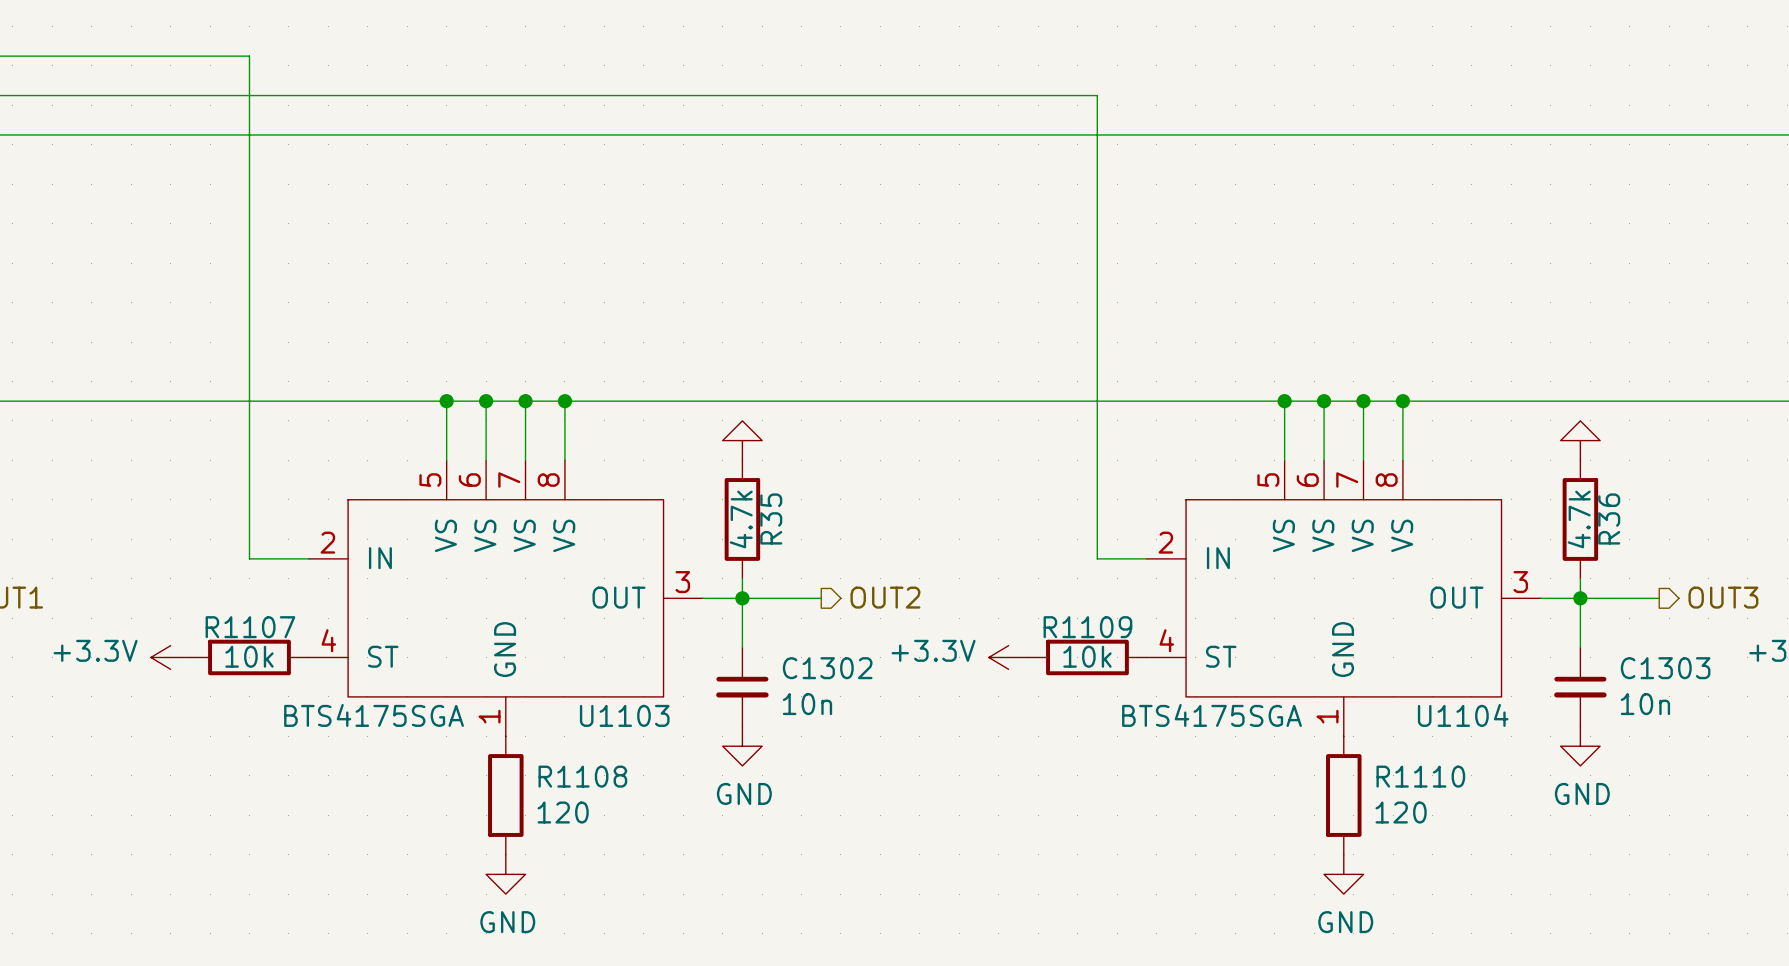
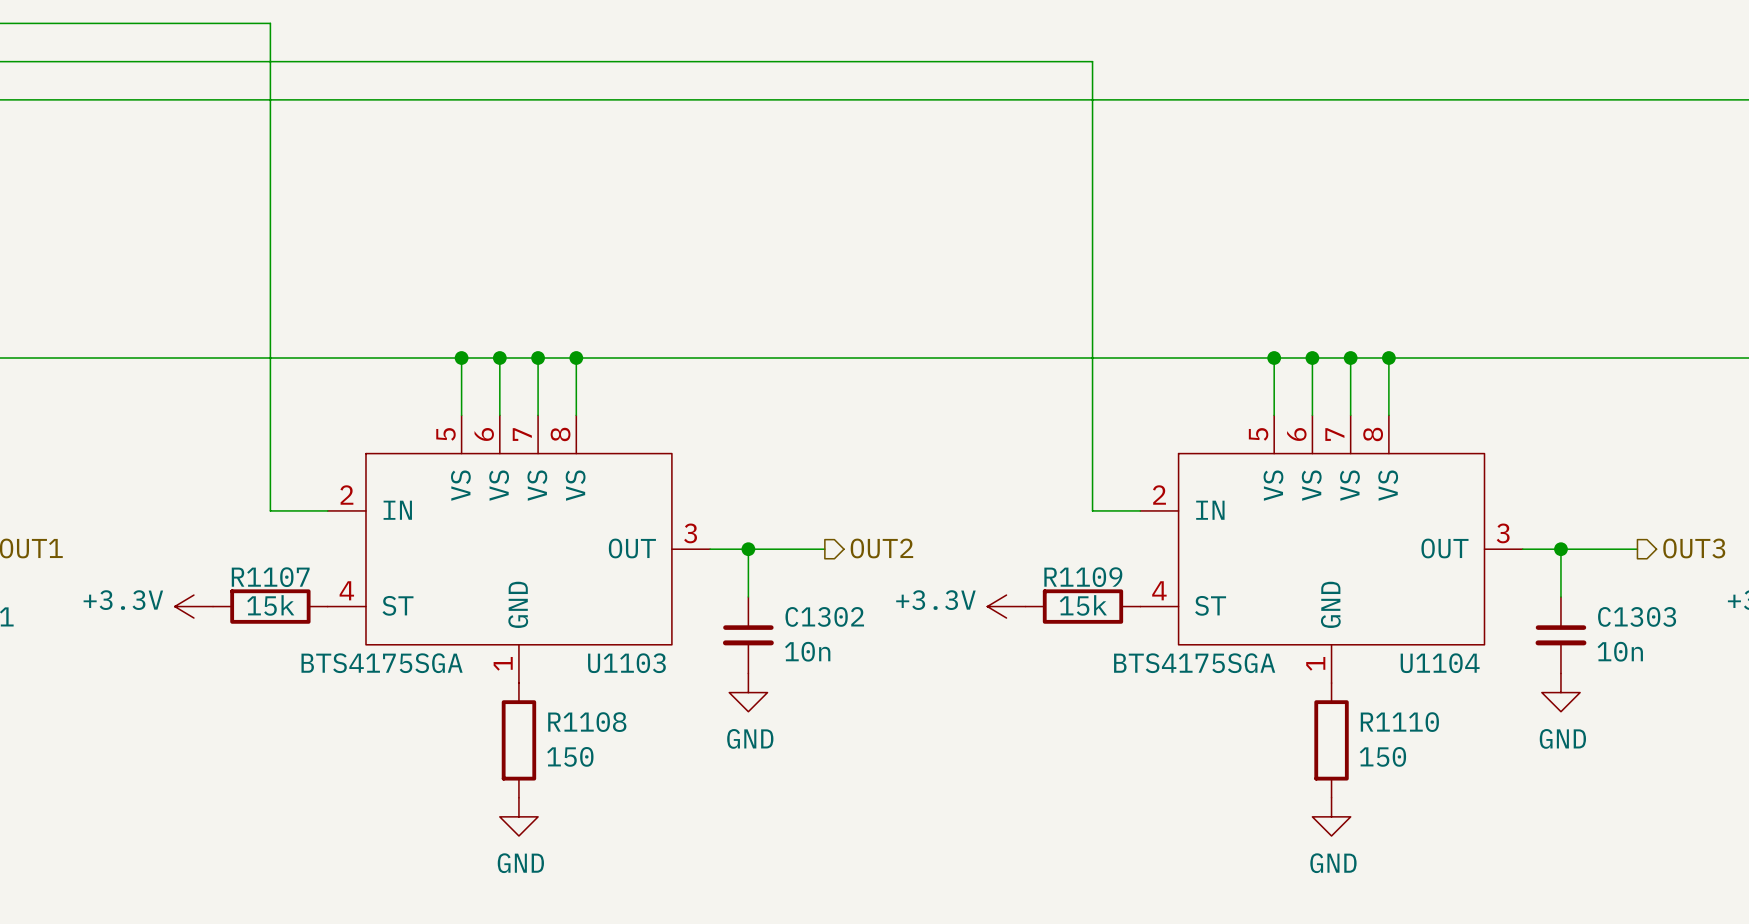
power symbol: (742, 440) -> none
power symbol: (1580, 440) -> none
R35: 4.7k (742, 519) -> none
R36: 4.7k (1580, 519) -> none
wire: (742, 578) (742, 598) -> none
wire: (1580, 578) (1580, 598) -> none
R1107 value: 10k (249, 656) -> 15k (270, 605)
R1109 value: 10k (1087, 656) -> 15k (1083, 605)
R1108 value: 120 (563, 812) -> 150 (570, 756)
R1110 value: 120 (1401, 812) -> 150 (1382, 756)

